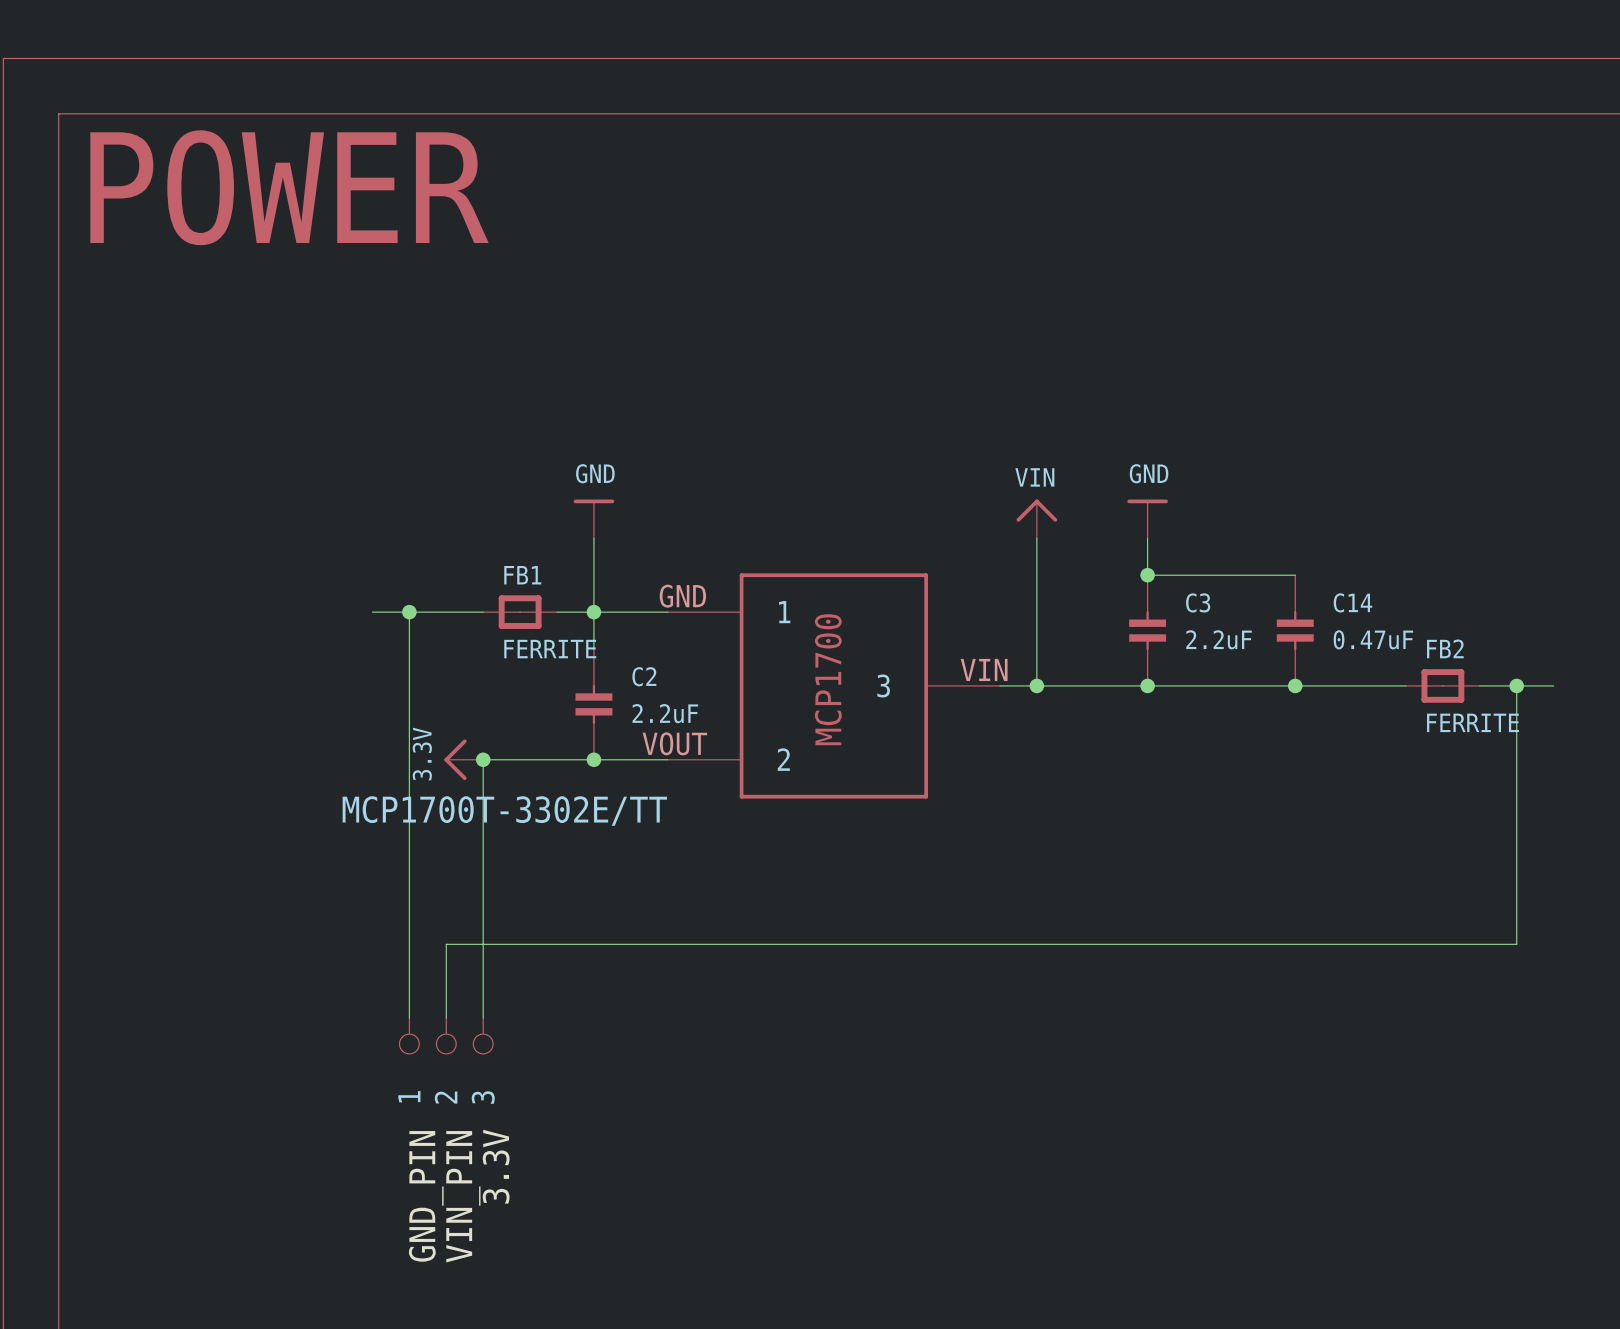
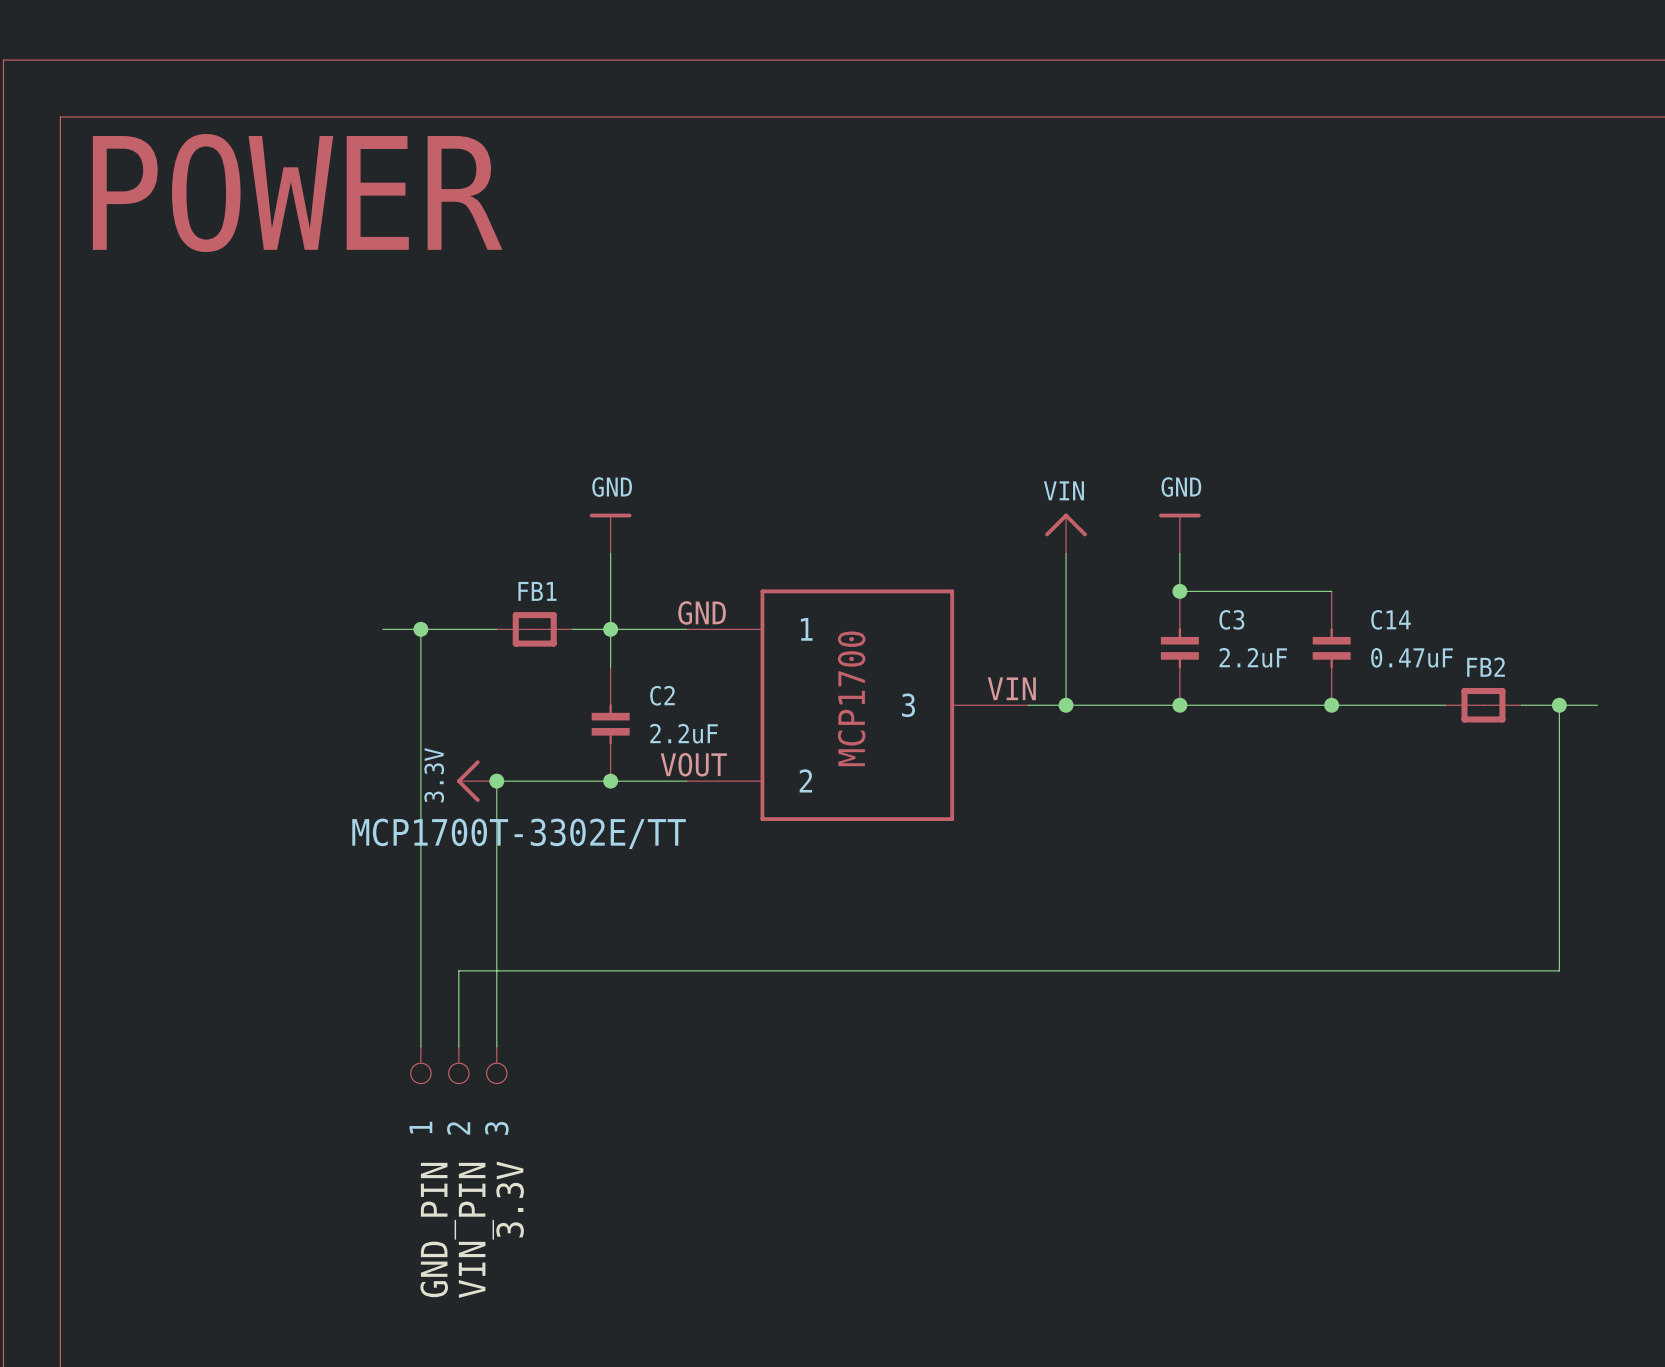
FB1 value: FERRITE (550, 649) -> none
FB2 value: FERRITE (1473, 722) -> none

